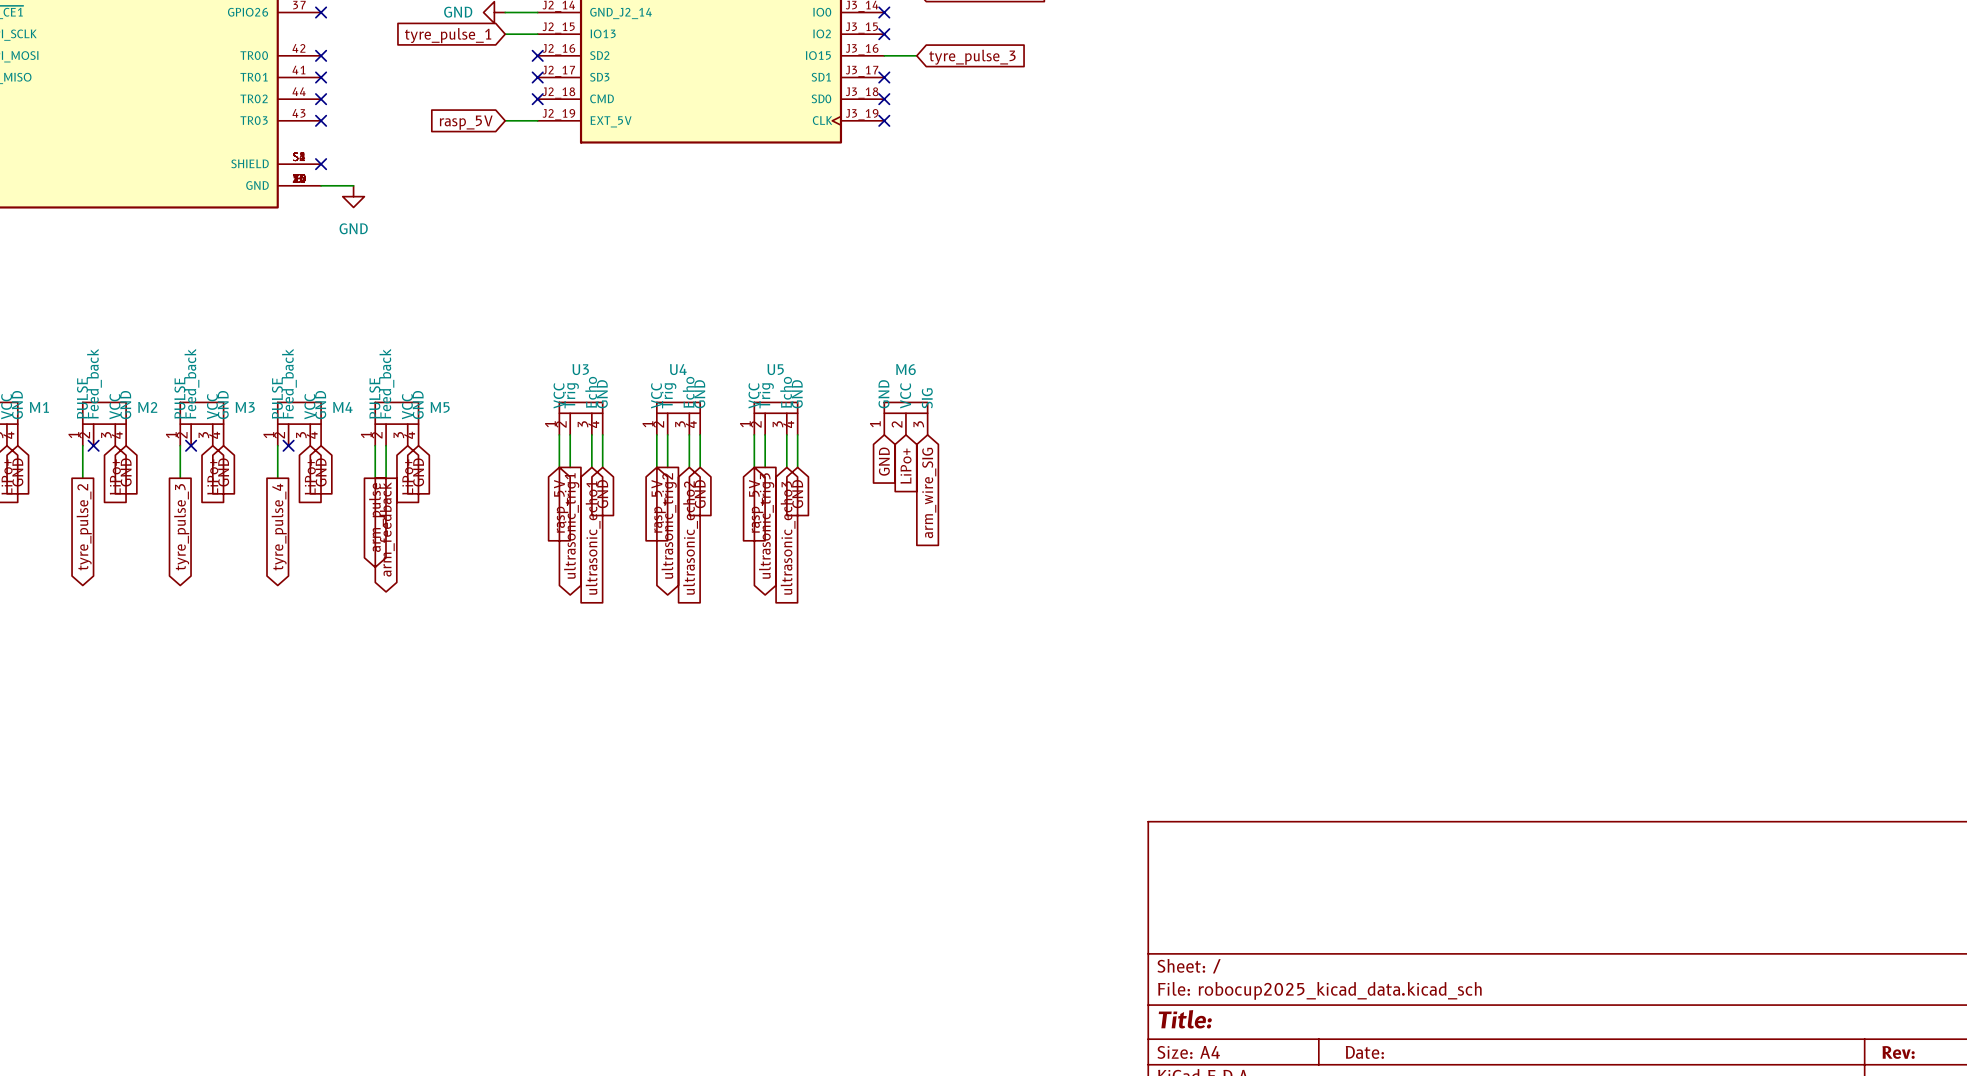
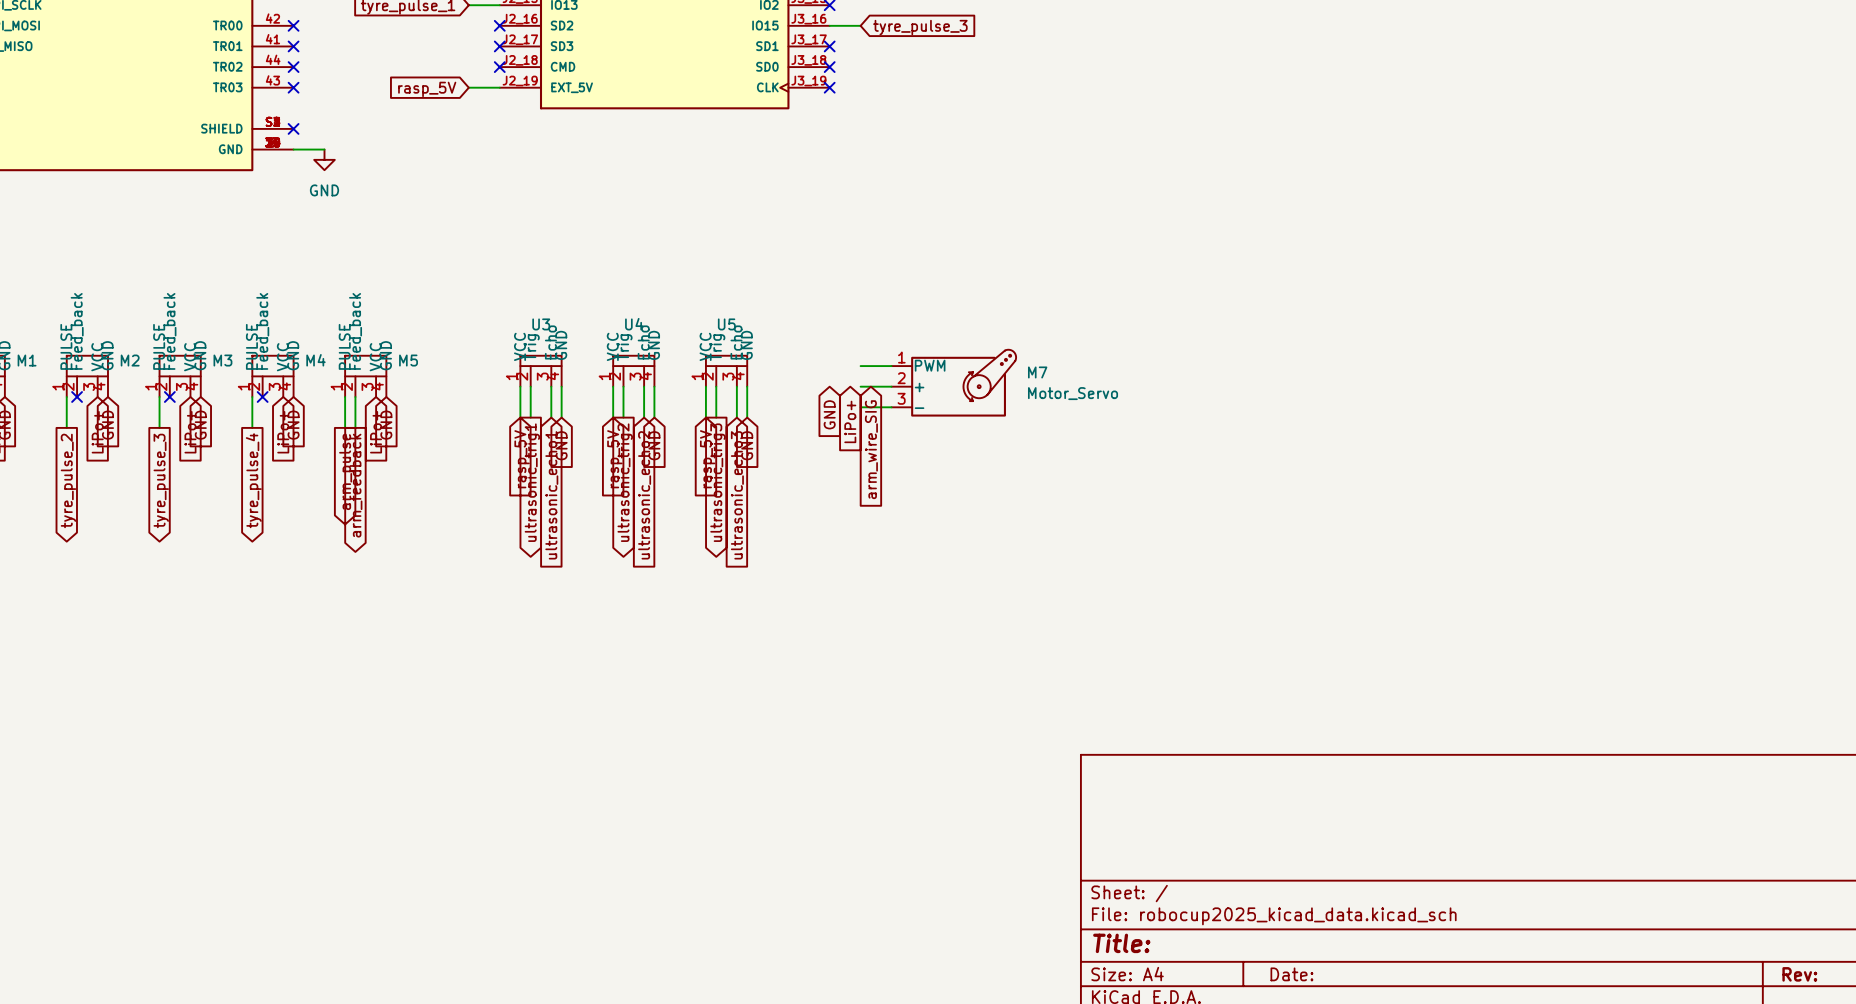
wire: none -> (860, 366) (891, 366)
M6: (905, 418) -> none
M7: none -> Motor_Servo (953, 383)
wire: none -> (860, 386) (891, 386)
wire: none -> (860, 407) (891, 407)

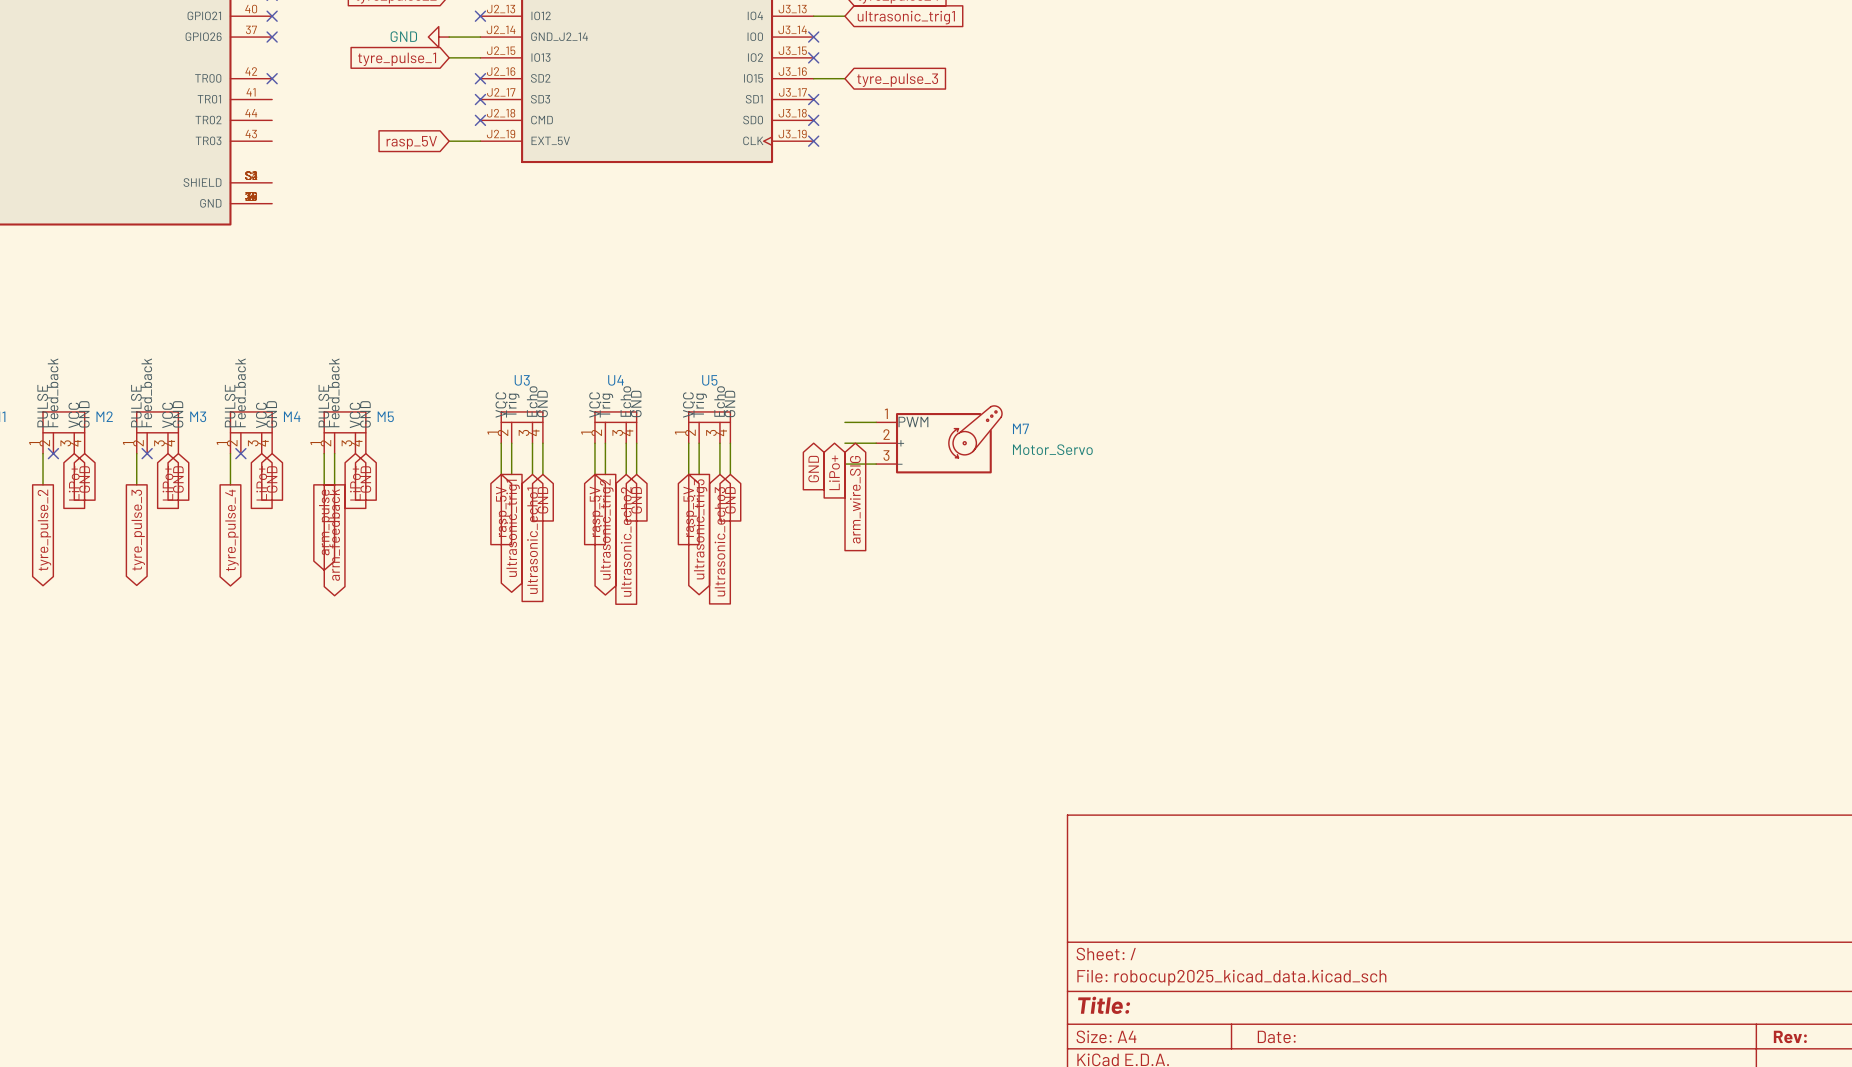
no-connect mark: (293, 46) -> none
no-connect mark: (293, 67) -> none
no-connect mark: (293, 87) -> none
no-connect mark: (293, 128) -> none
wire: (293, 149) (324, 149) -> none
power symbol: GND (324, 159) -> none

